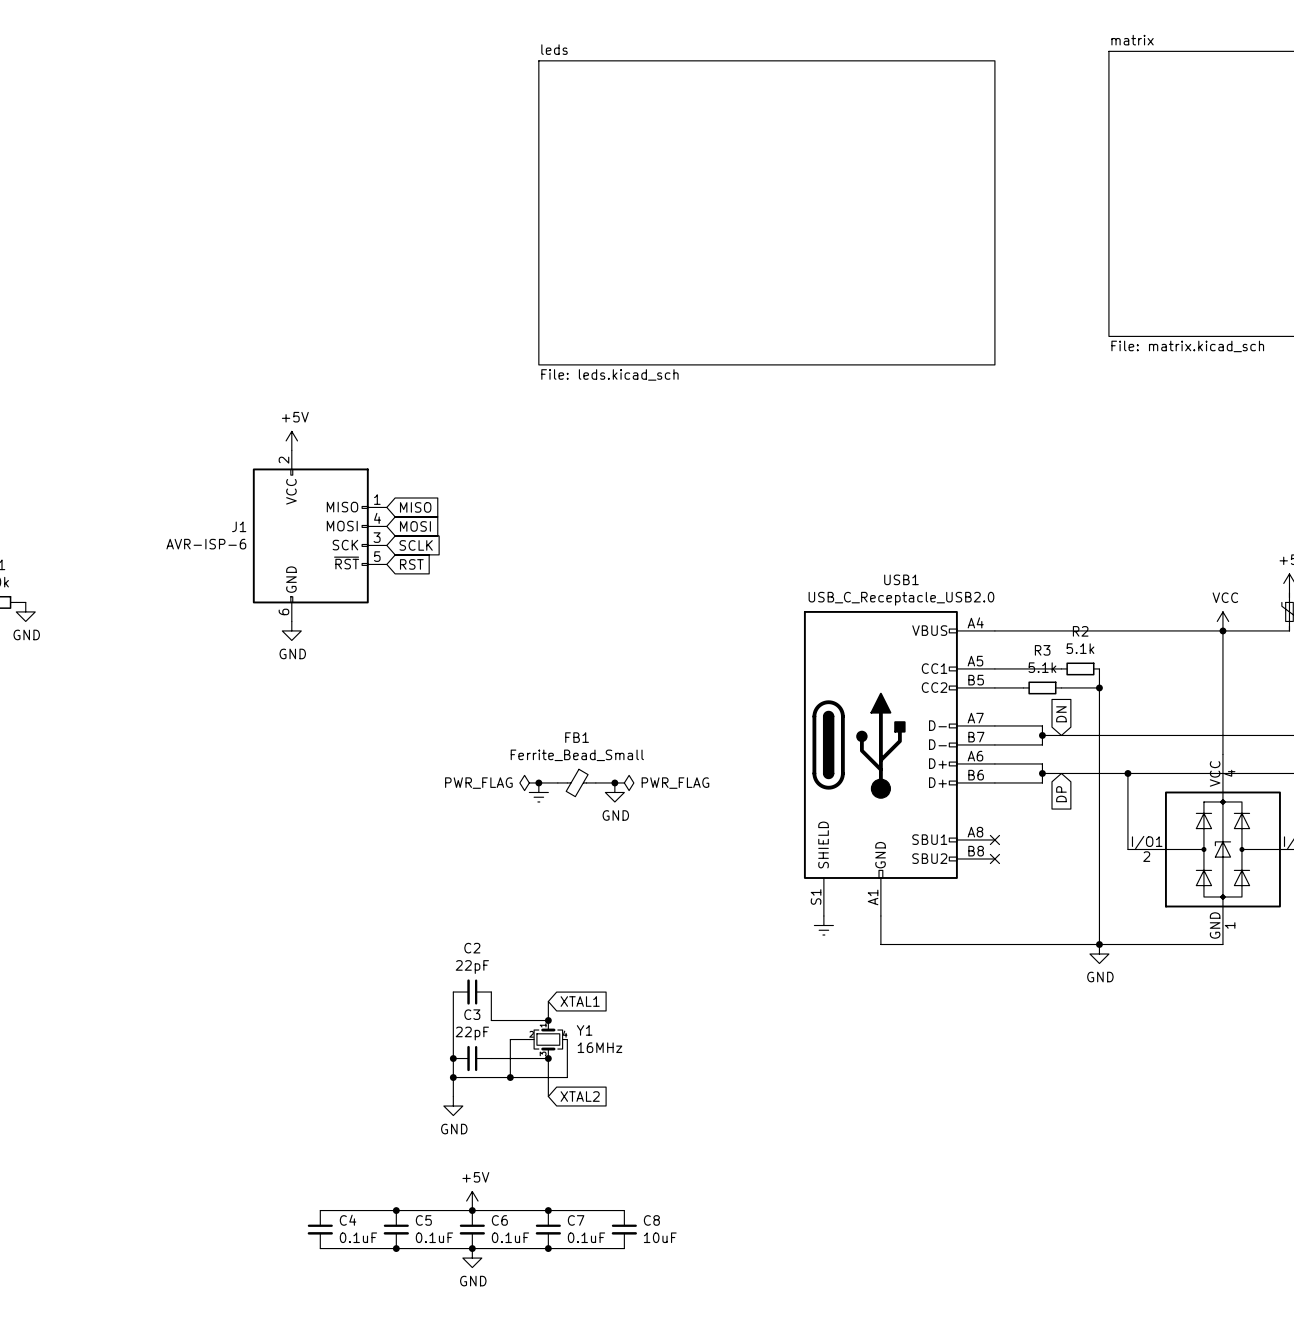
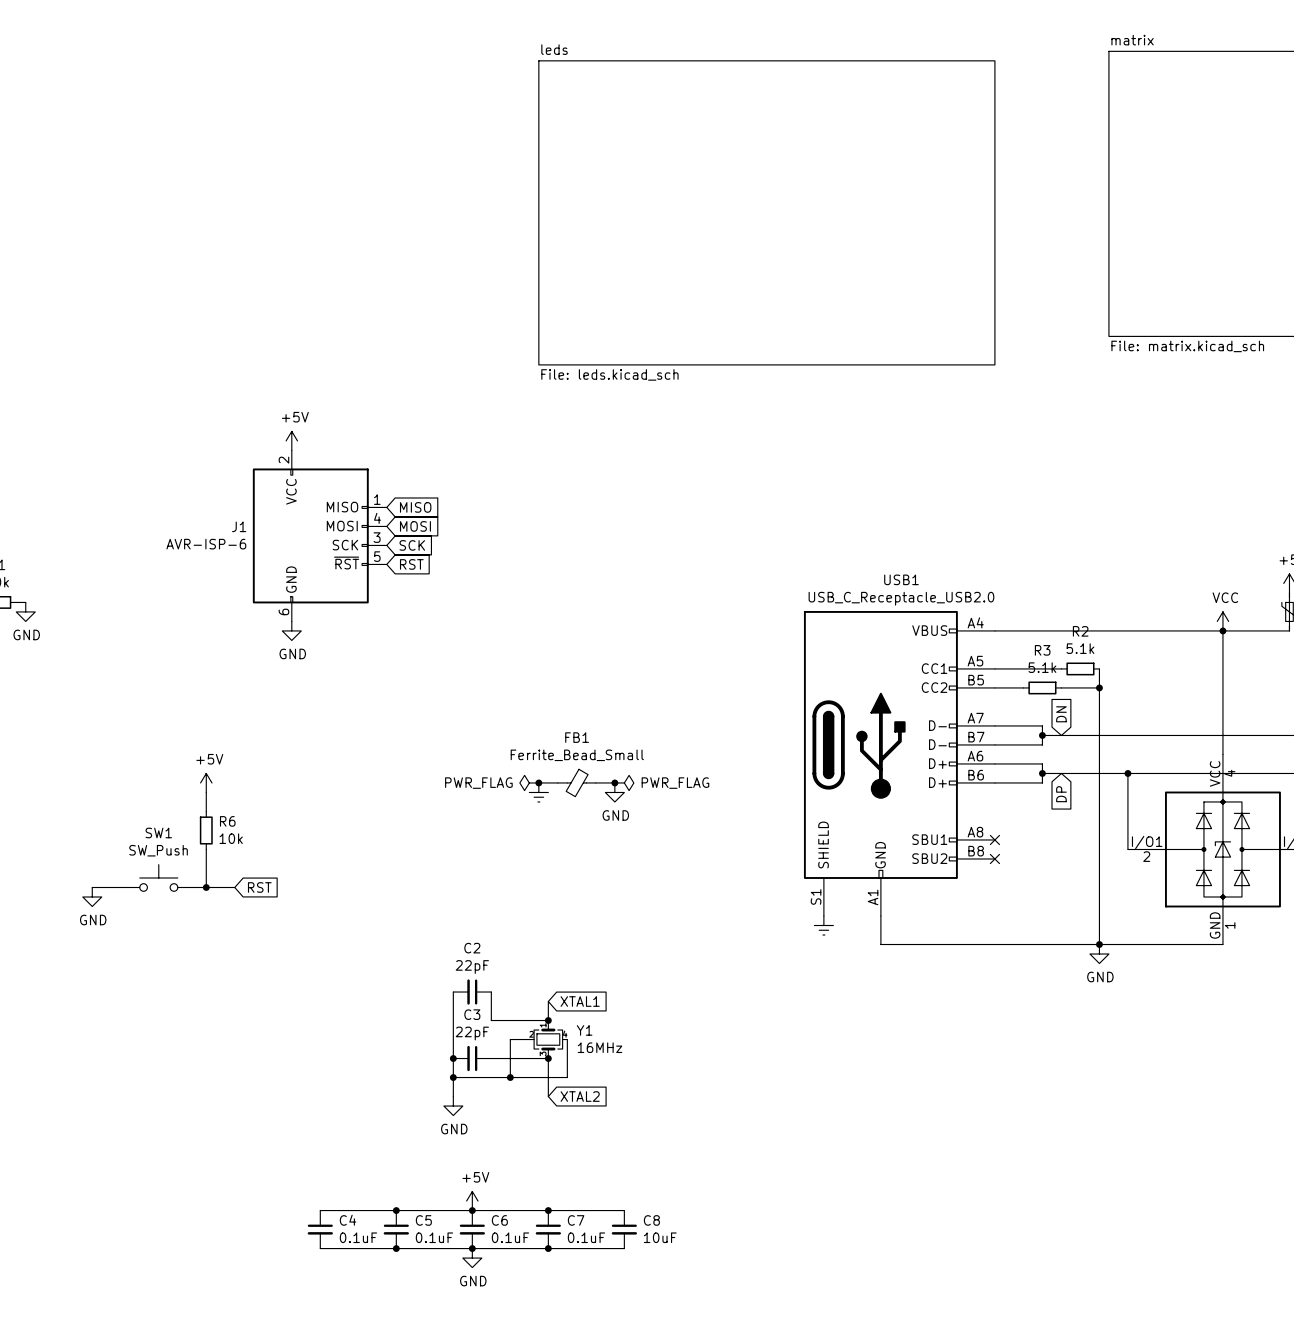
global label: SCLK (416, 545) -> SCK (412, 545)
power symbol: none -> +5V (206, 782)
wire: none -> (206, 792) (206, 811)
R6: none -> 10k (206, 830)
wire: none -> (206, 849) (206, 887)
SW1: none -> SW_Push (158, 877)
wire: none -> (92, 887) (120, 887)
wire: none -> (196, 887) (234, 887)
junction: none -> (206, 887)
global label: none -> RST (259, 887)
power symbol: none -> GND (92, 897)

